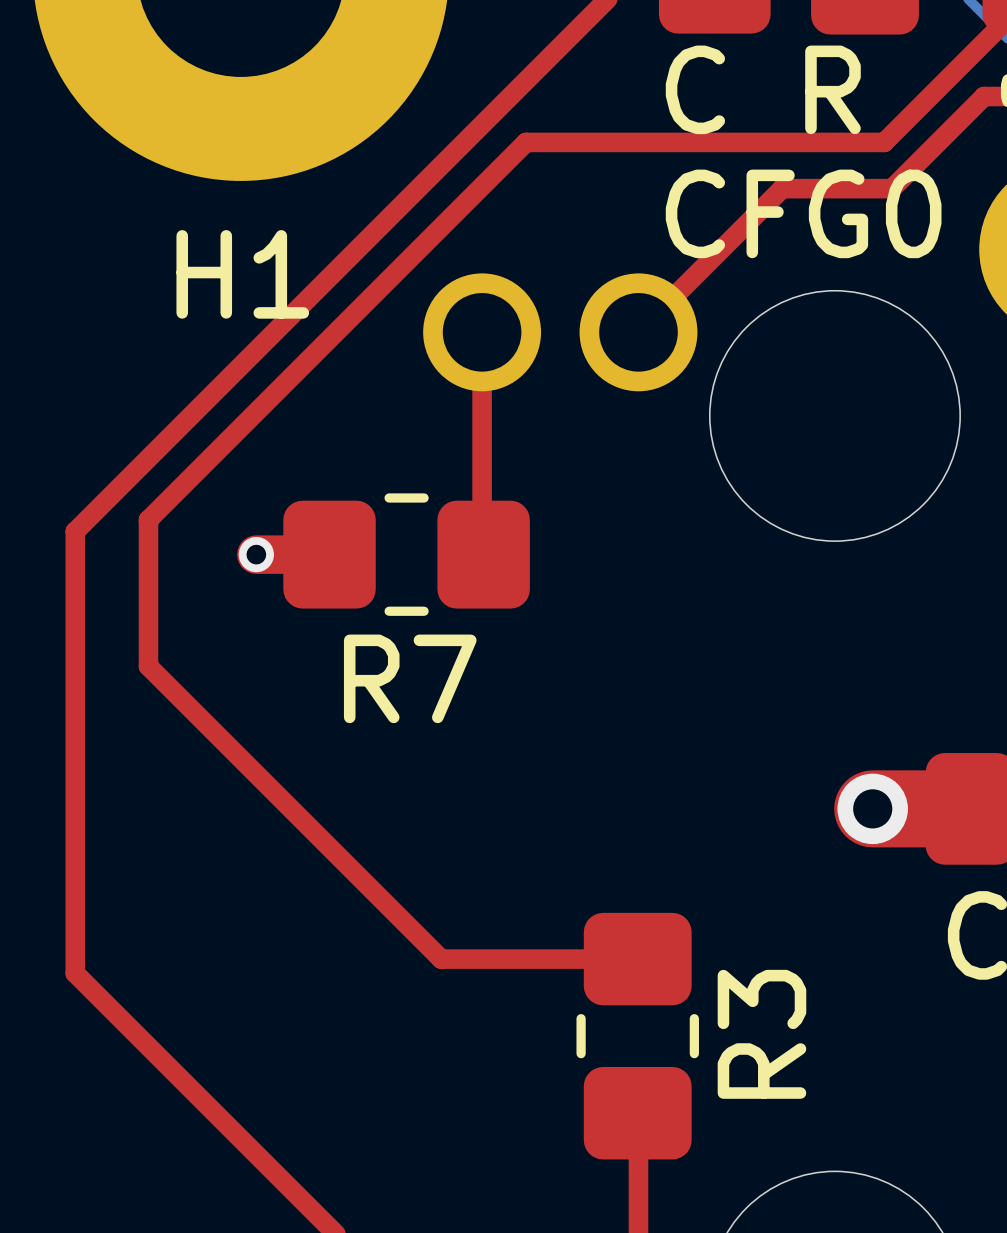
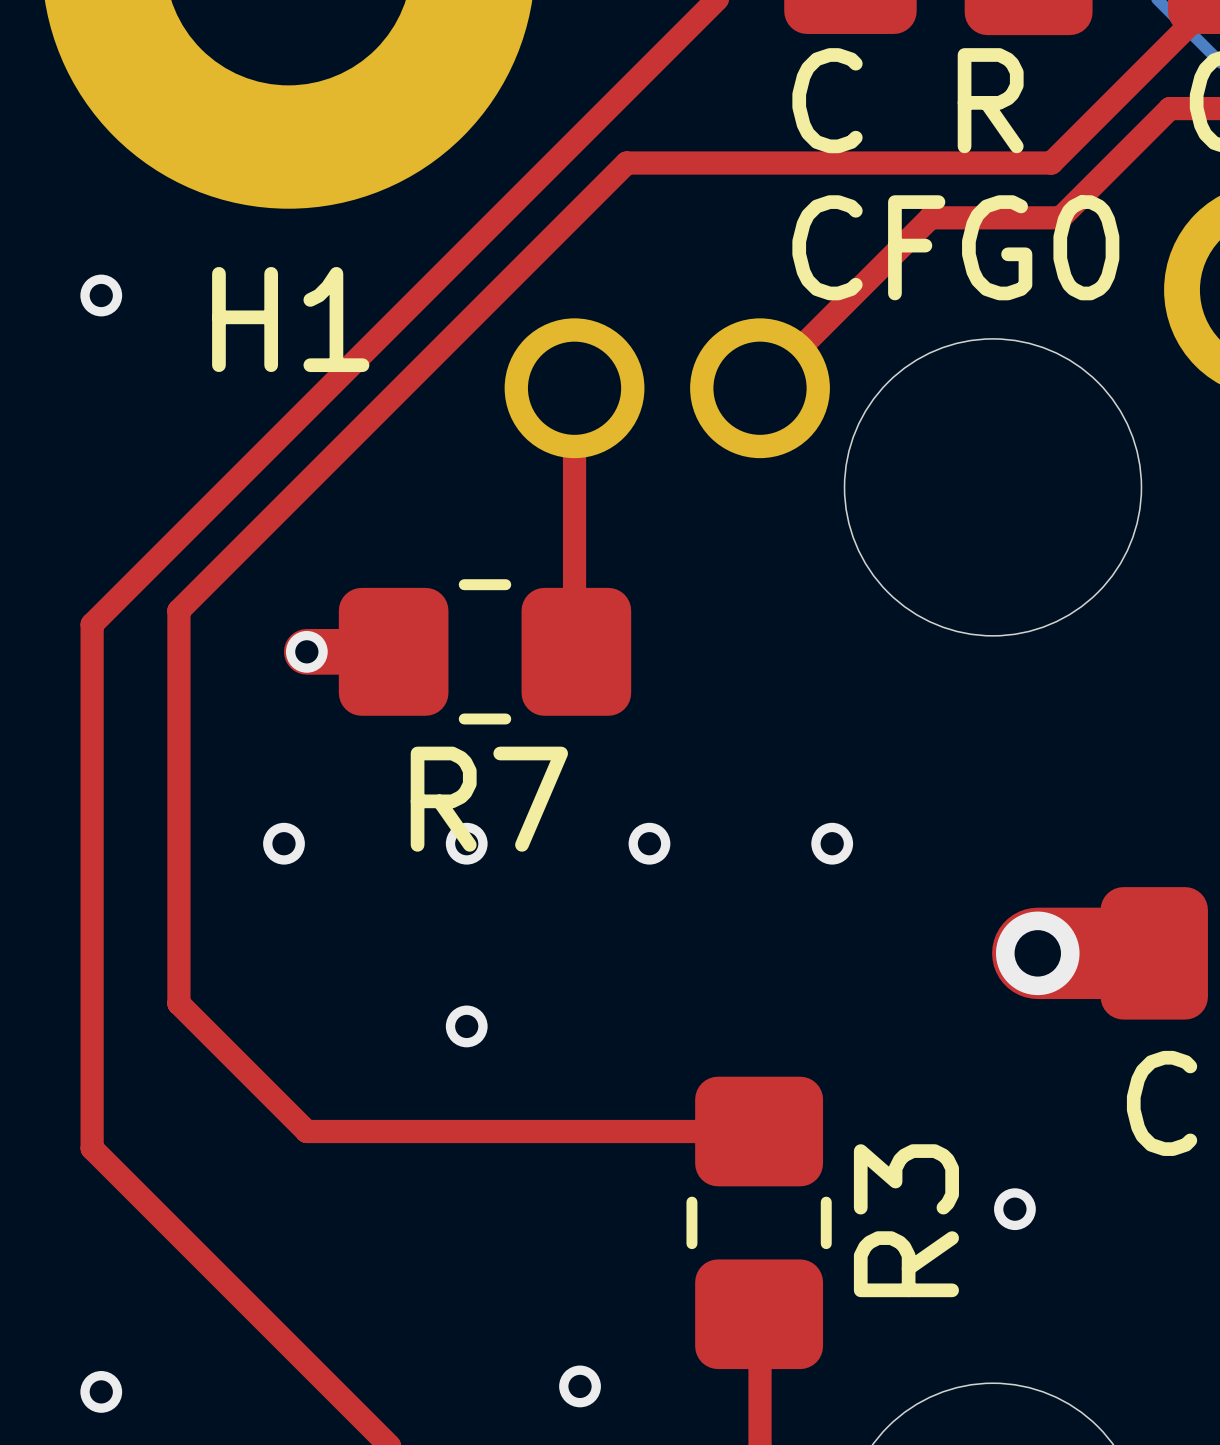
via: none -> (101, 295)
top track: (148, 666) (441, 959) -> (178, 784) (178, 1003) (306, 1131) (526, 1131)
via: none -> (283, 843)
via: none -> (466, 843)
via: none -> (649, 843)
via: none -> (832, 843)
via: none -> (466, 1026)
via: none -> (1014, 1209)
via: none -> (580, 1386)
via: none -> (101, 1391)

